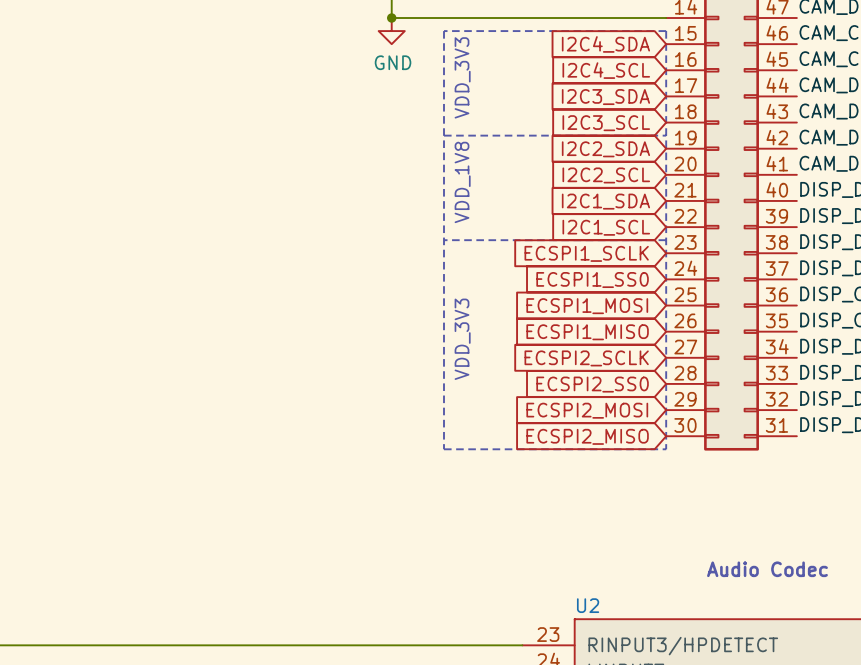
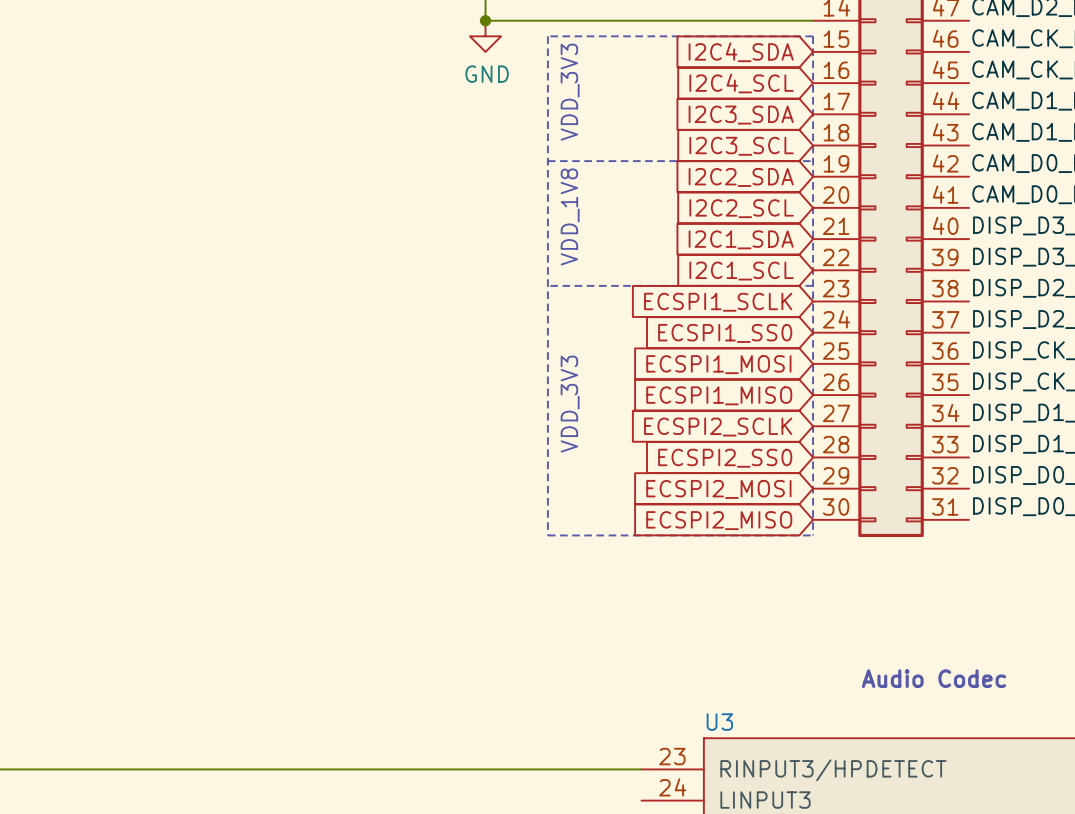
U2 name: U2 (588, 605) -> U3 (719, 722)

